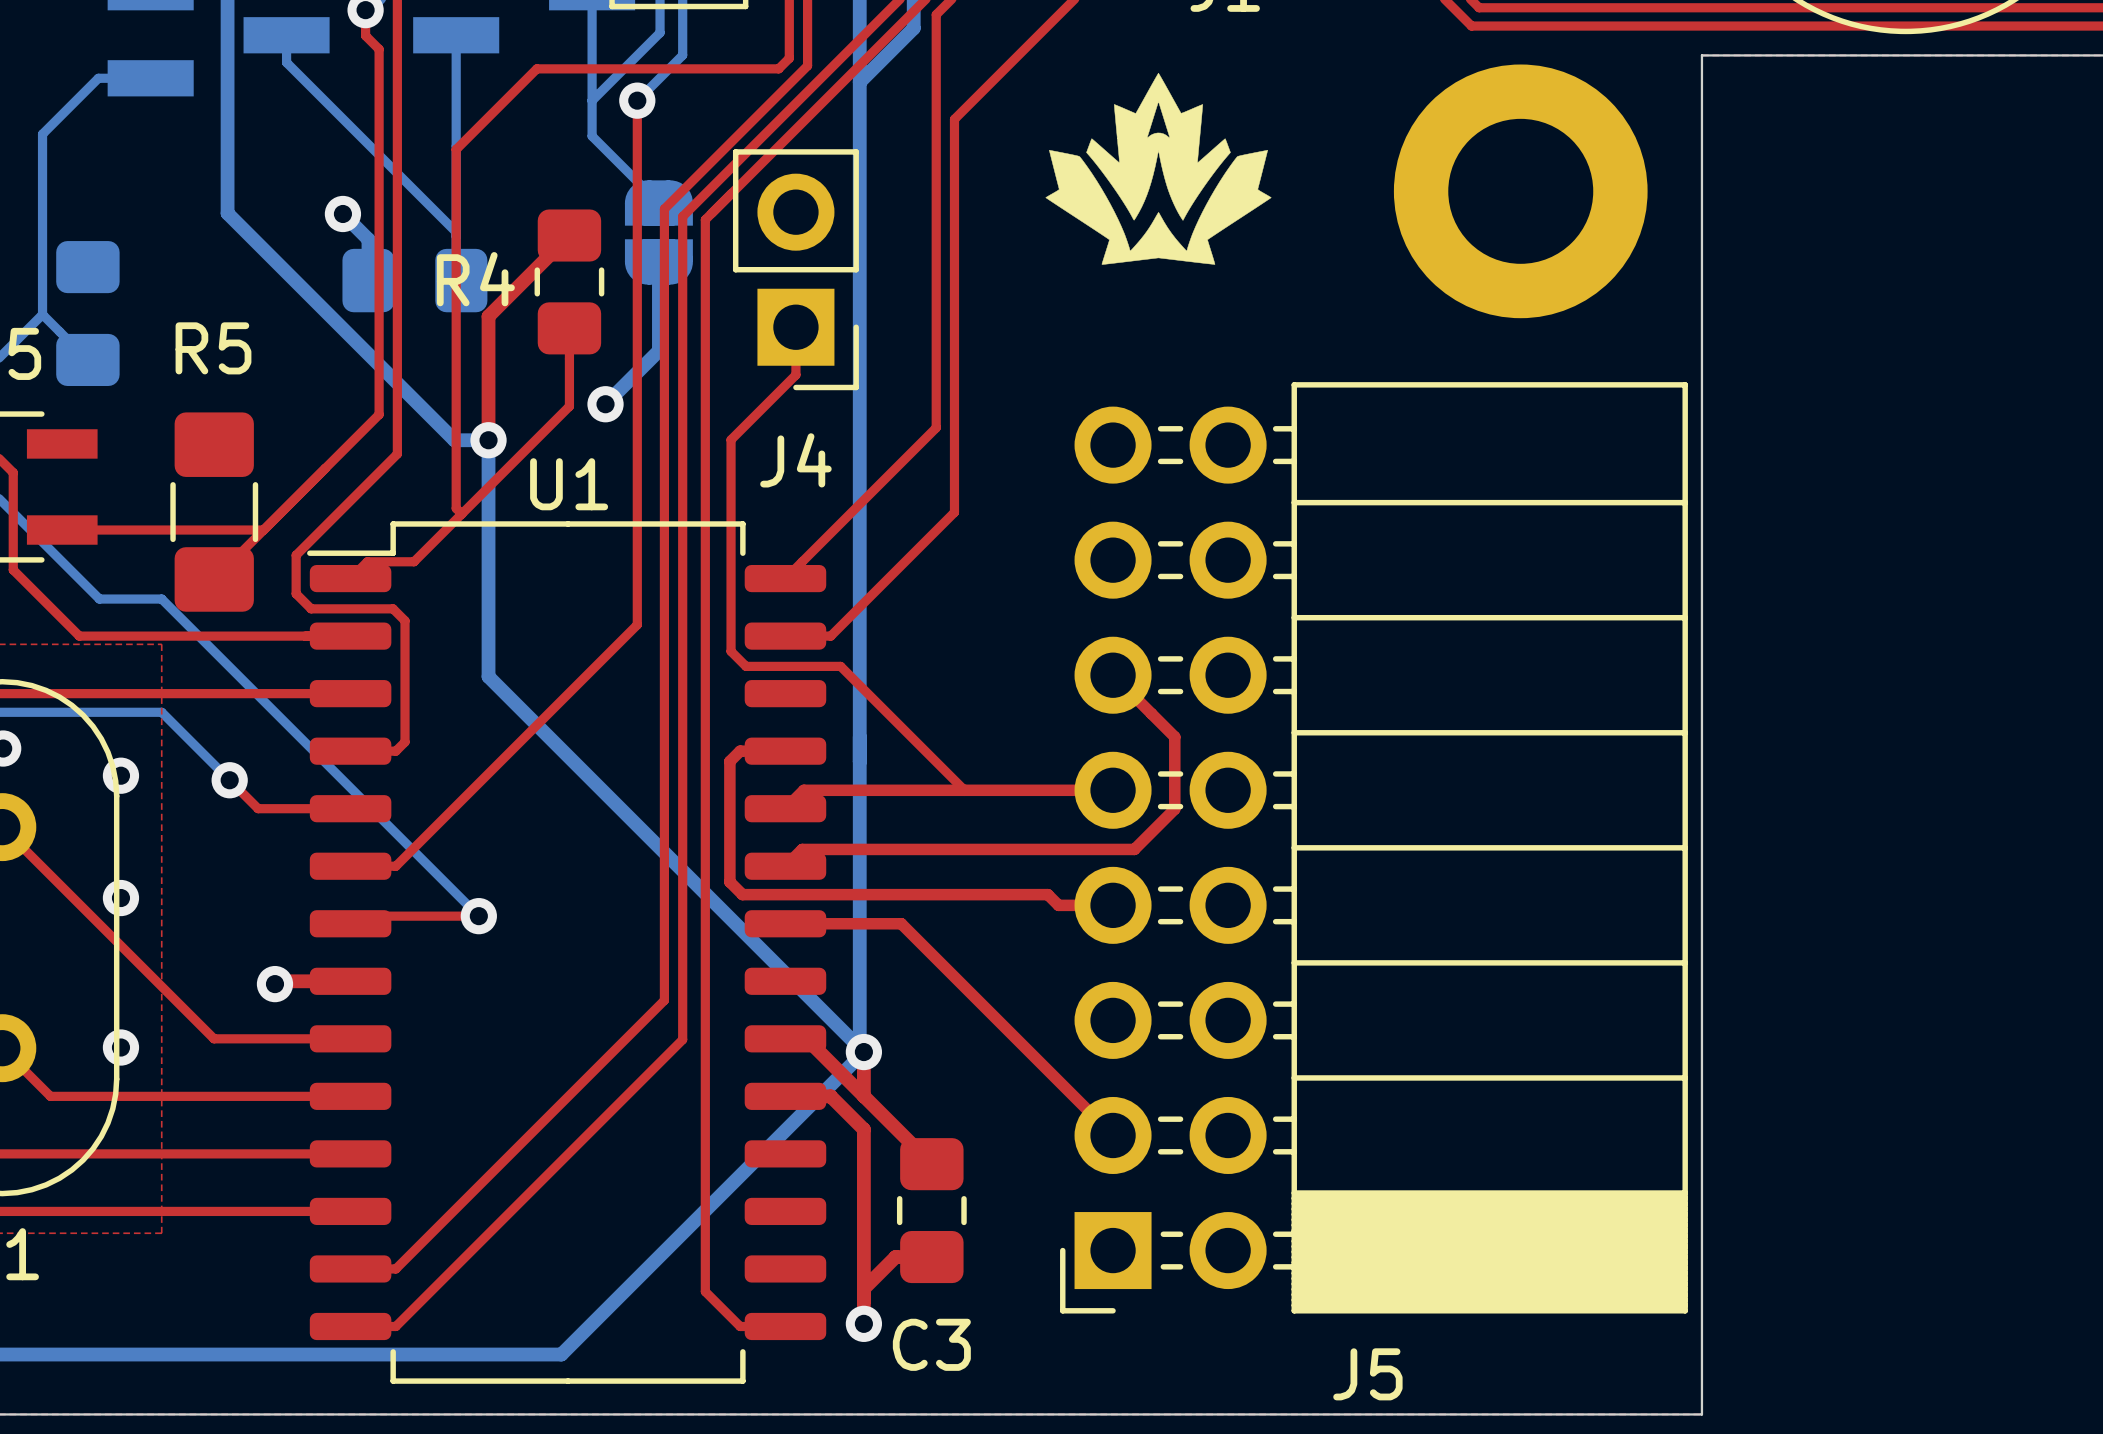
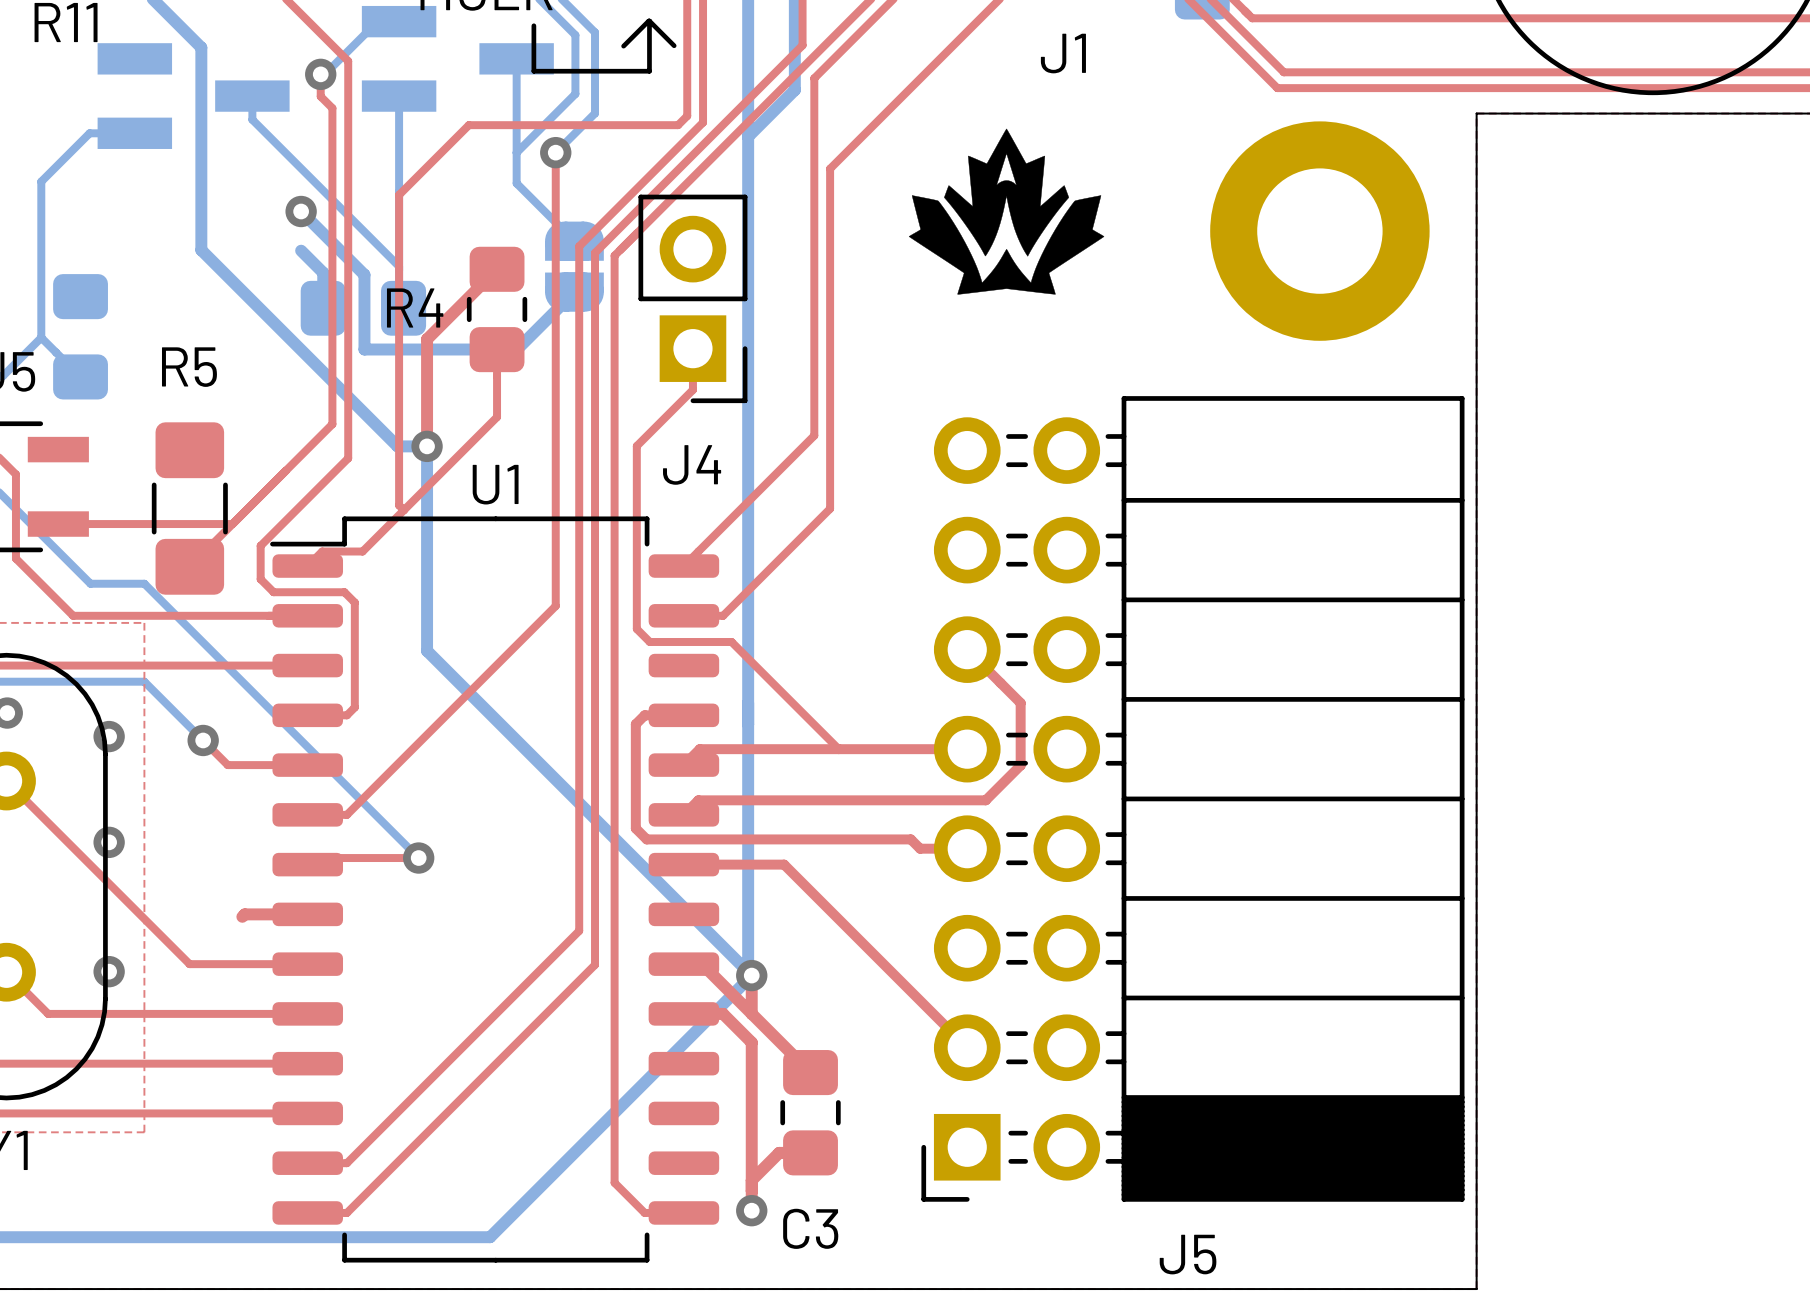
via position: (342, 213) -> (301, 211)
bottom track: (658, 261) (658, 350) (605, 404) -> (574, 292) (517, 349) (364, 349) (364, 274) (301, 211)
via: (605, 404) -> none
via: (274, 984) -> none

